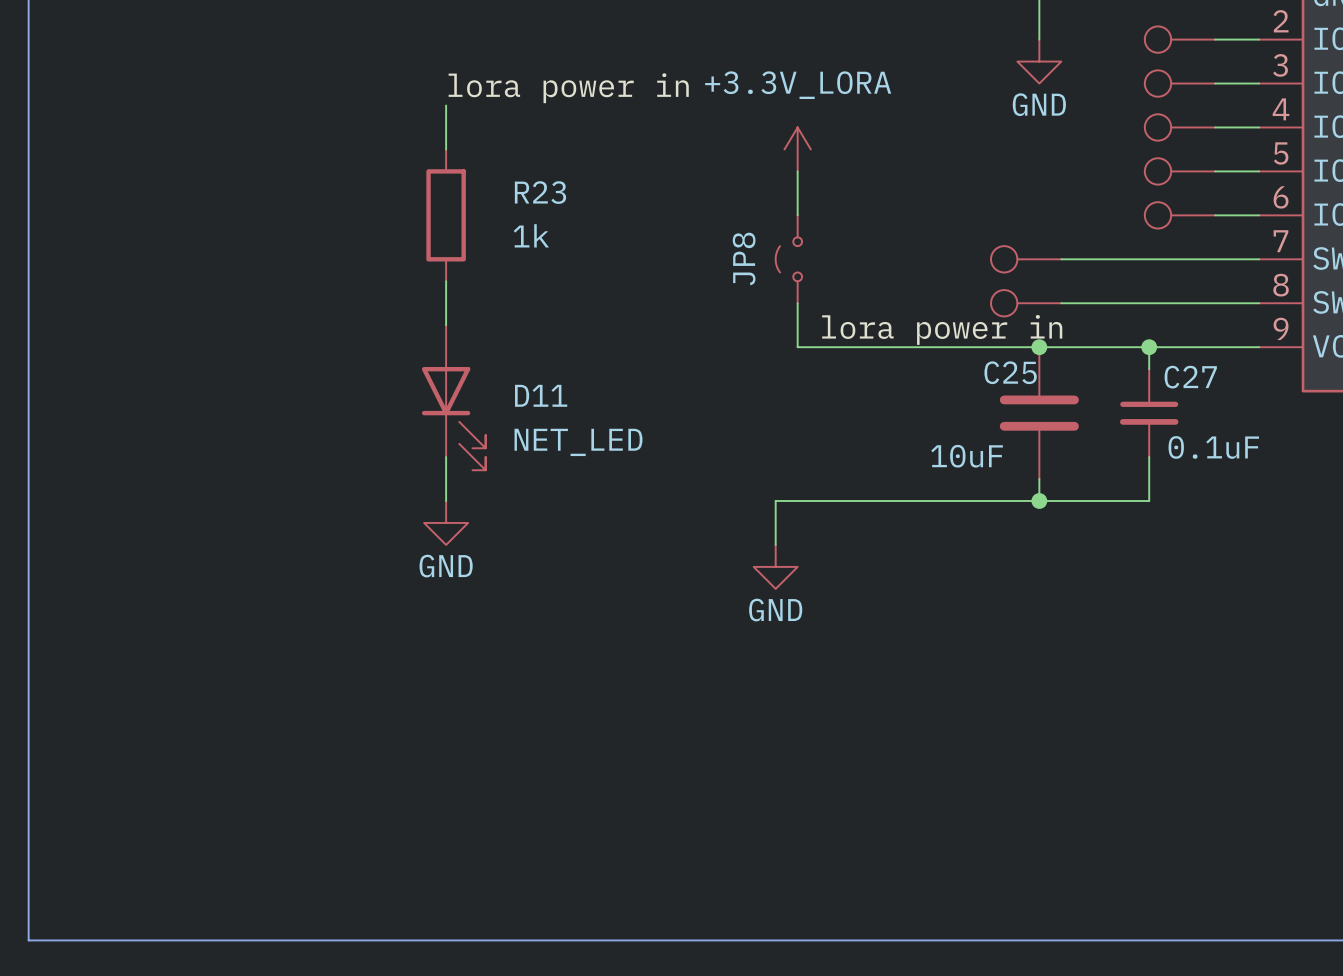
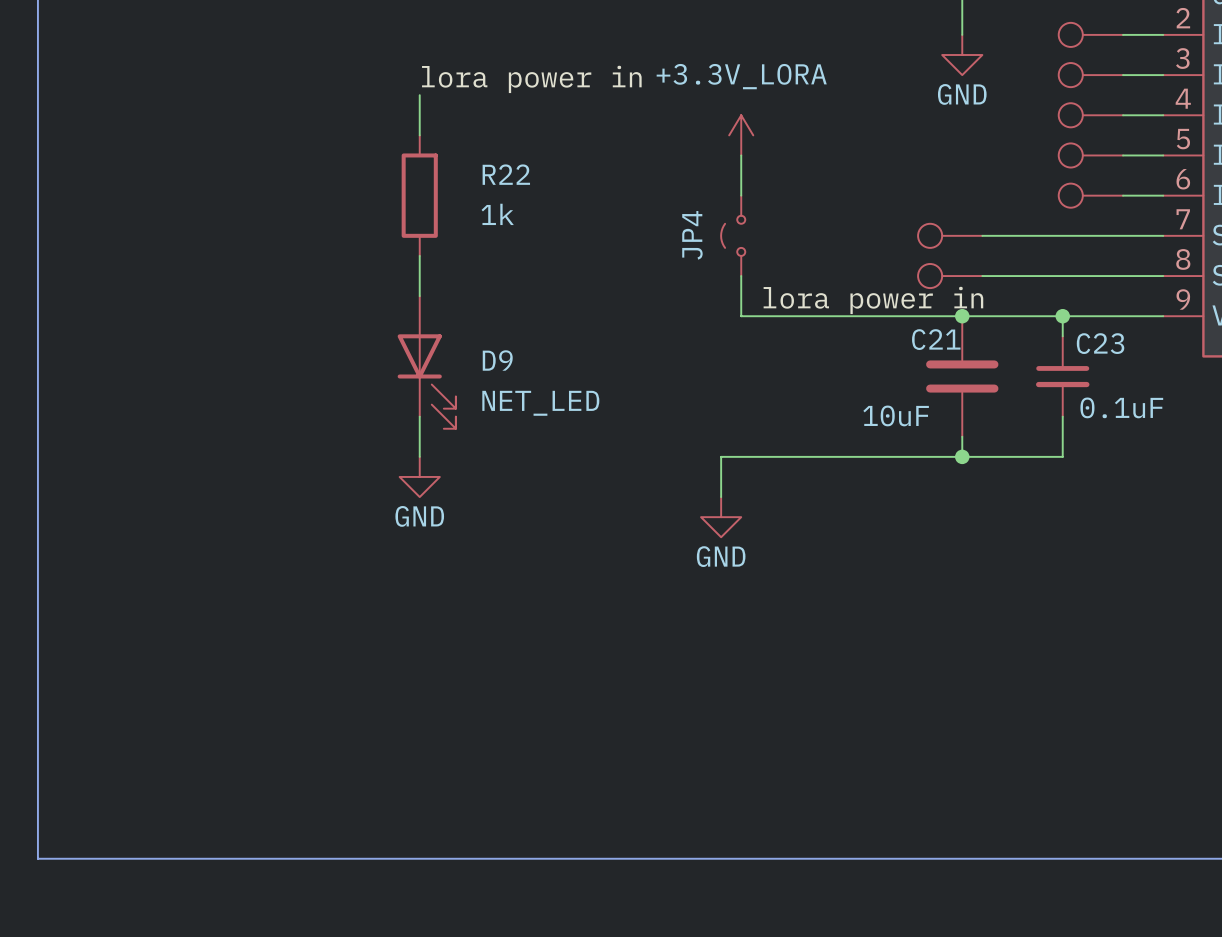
R23 name: R23 (540, 192) -> R22 (506, 174)
JP8 name: JP8 (744, 259) -> JP4 (692, 235)
C25 name: C25 (1010, 372) -> C21 (936, 339)
C27 name: C27 (1190, 377) -> C23 (1100, 343)
D11 name: D11 (541, 395) -> D9 (497, 360)

